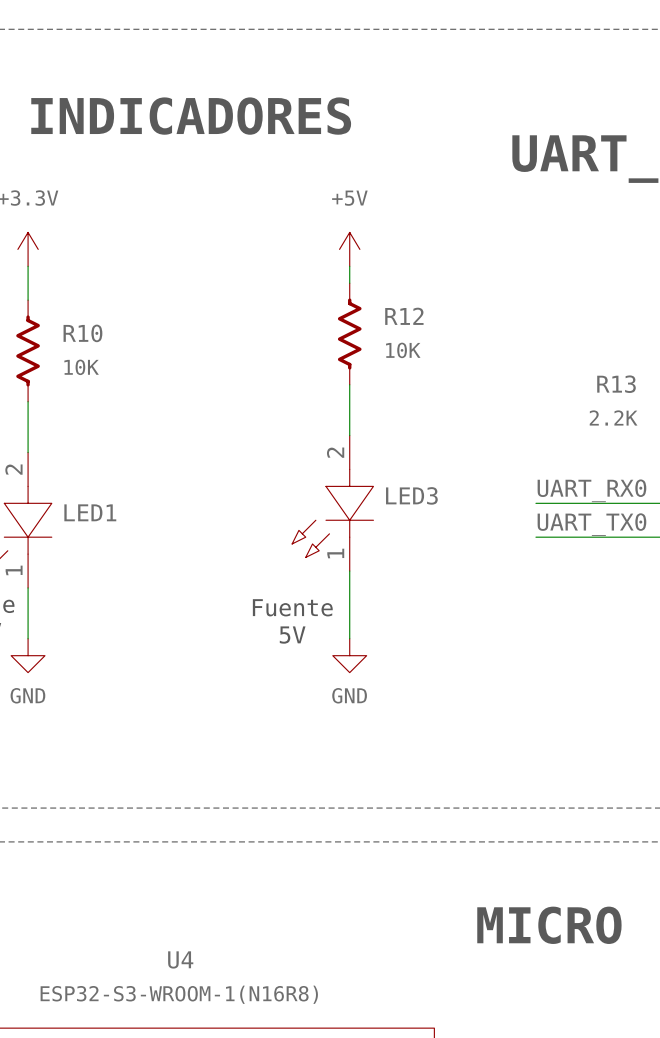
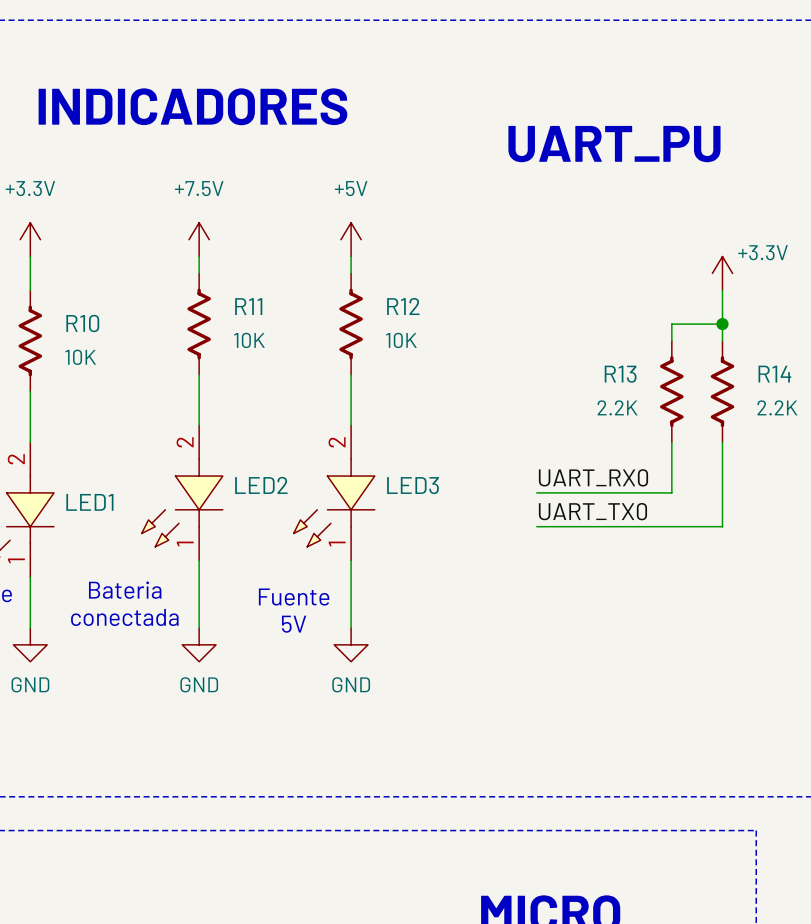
power symbol: none -> +7.5V (199, 239)
wire: none -> (199, 256) (199, 273)
R11: none -> 10K (199, 324)
wire: none -> (199, 374) (199, 425)
LED2: none -> (182, 492)
wire: none -> (199, 560) (199, 627)
text: none -> Bateria (125, 590)
text: none -> conectada (124, 617)
power symbol: none -> GND (199, 644)

